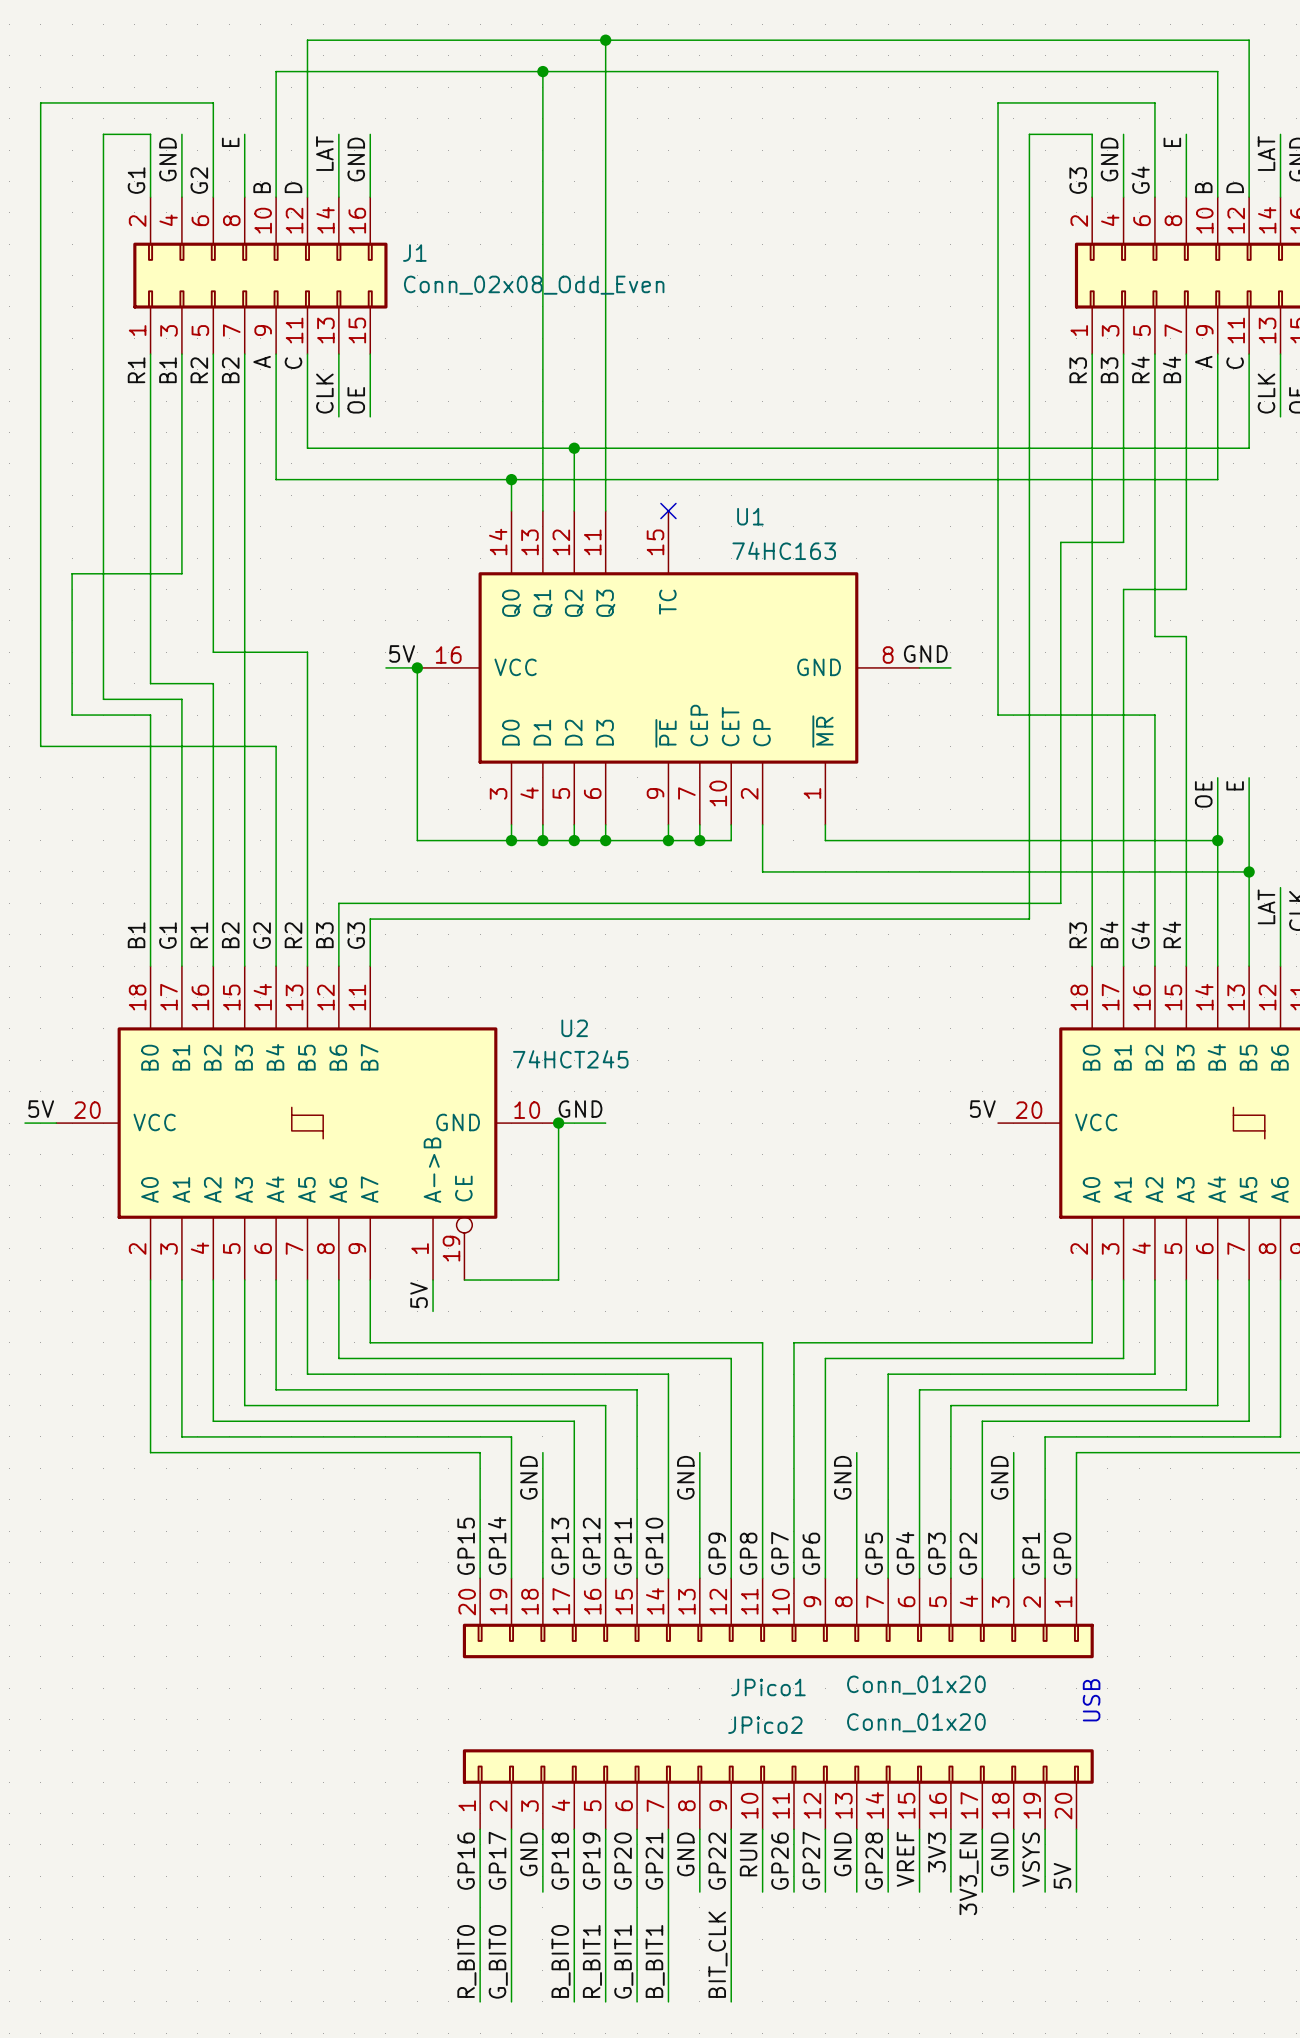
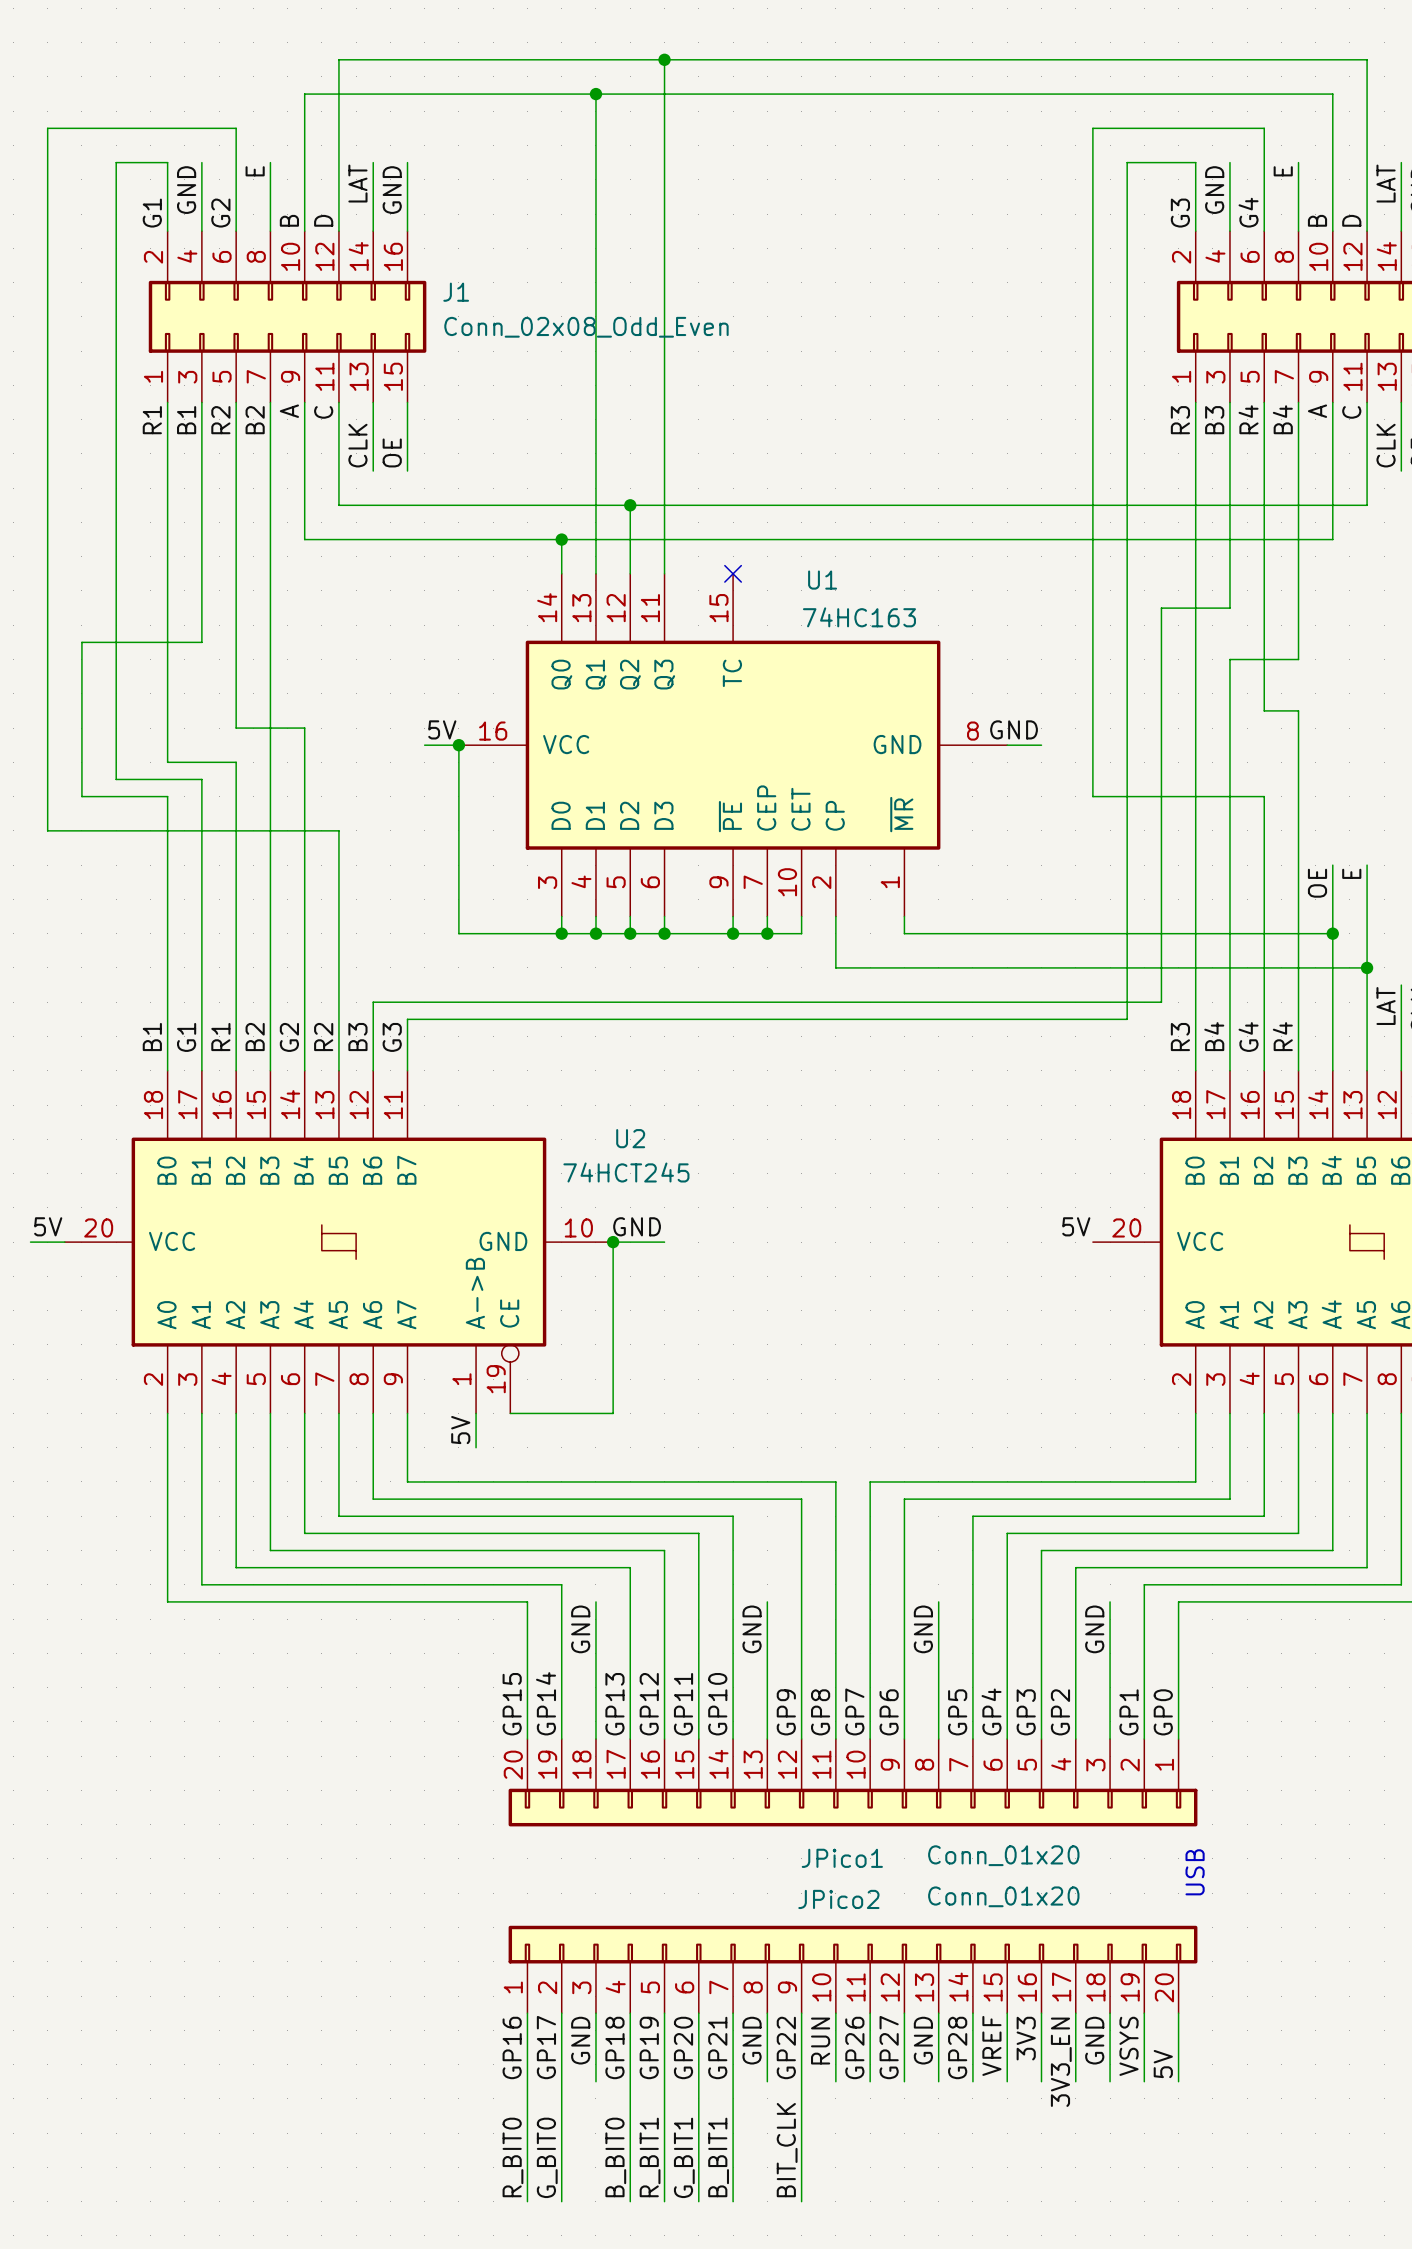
wire: (276, 652) (307, 652) (307, 746) -> (304, 728) (304, 830) (338, 830)

